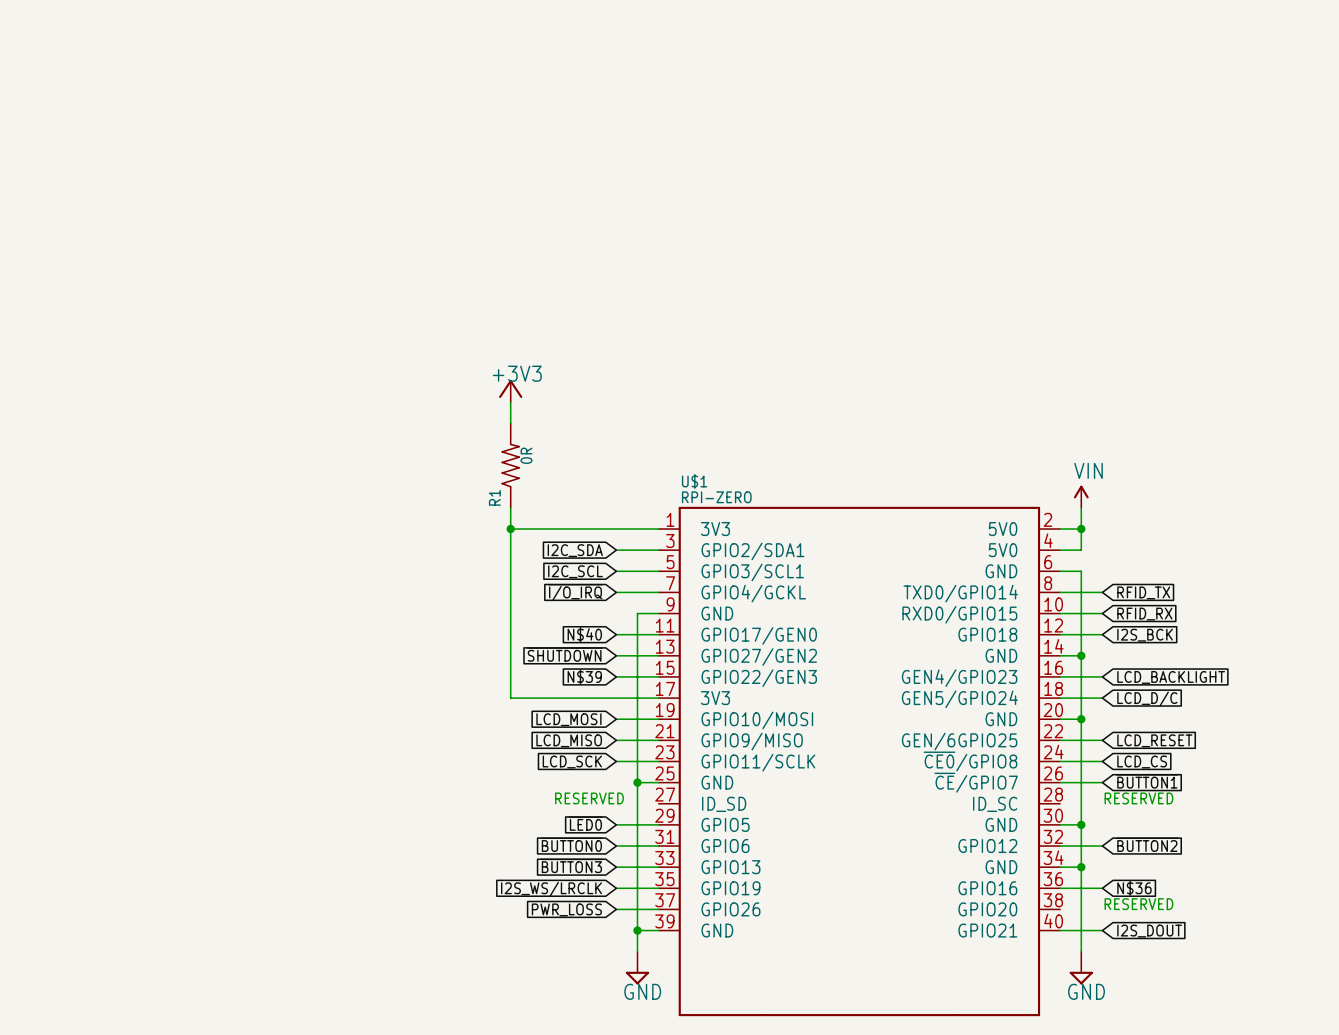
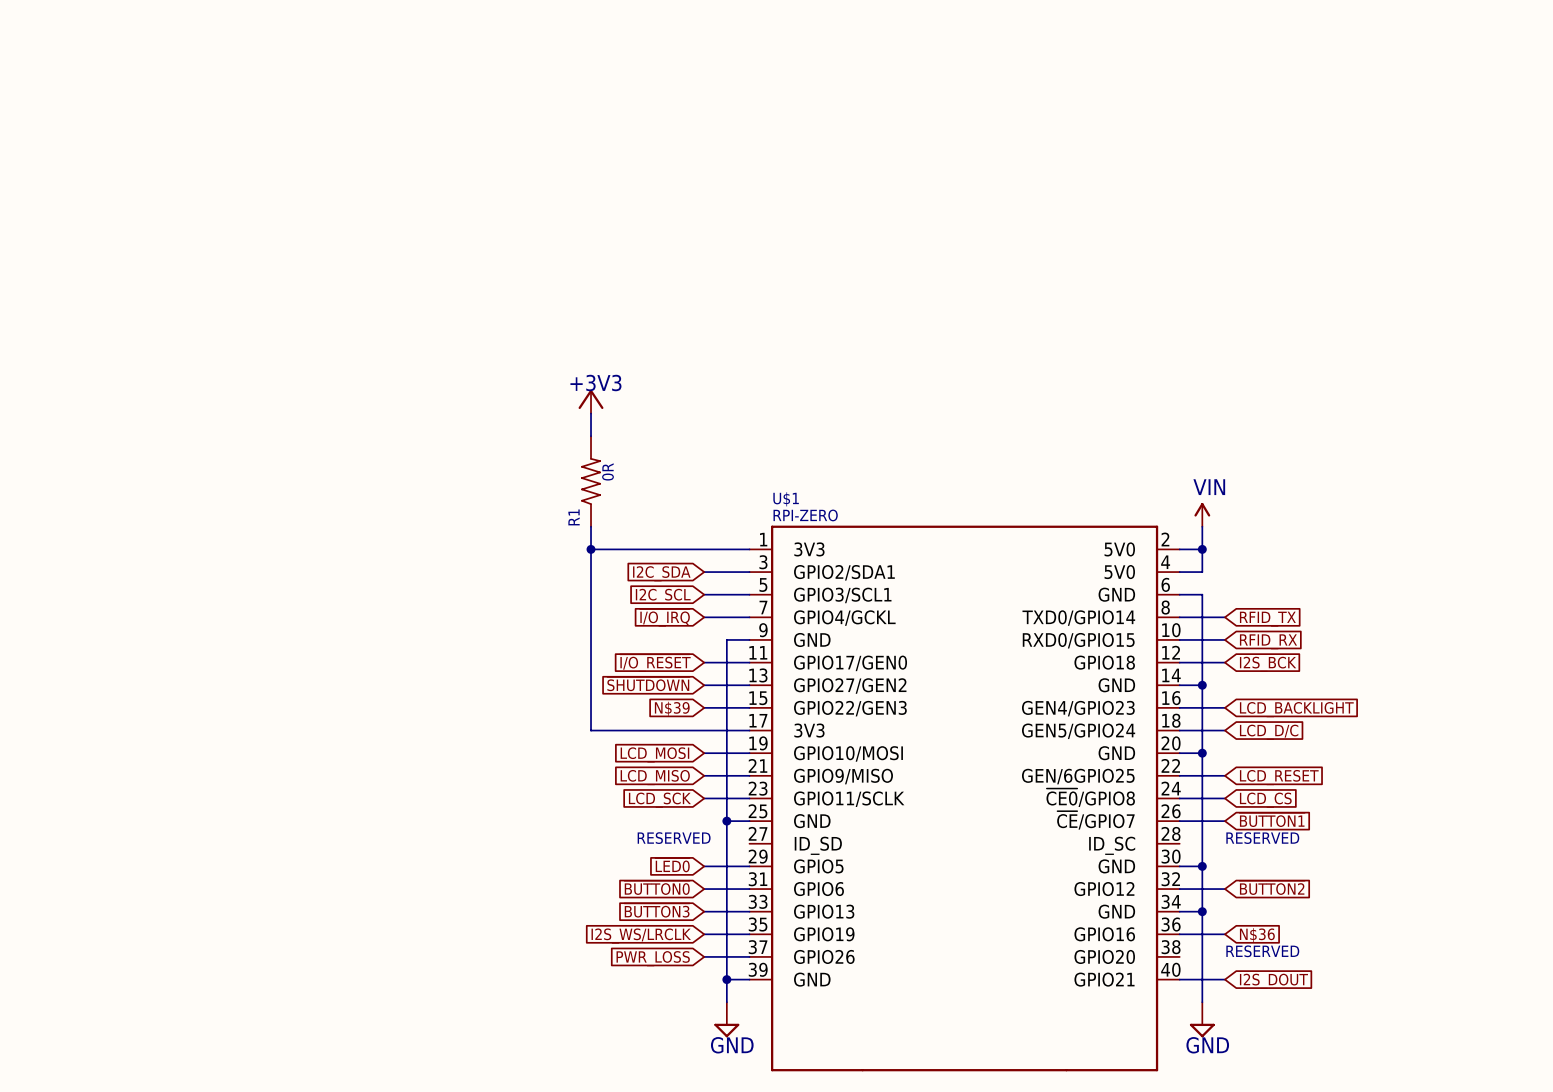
global label: N$40 (584, 634) -> ~{I/O_RESET} (655, 663)

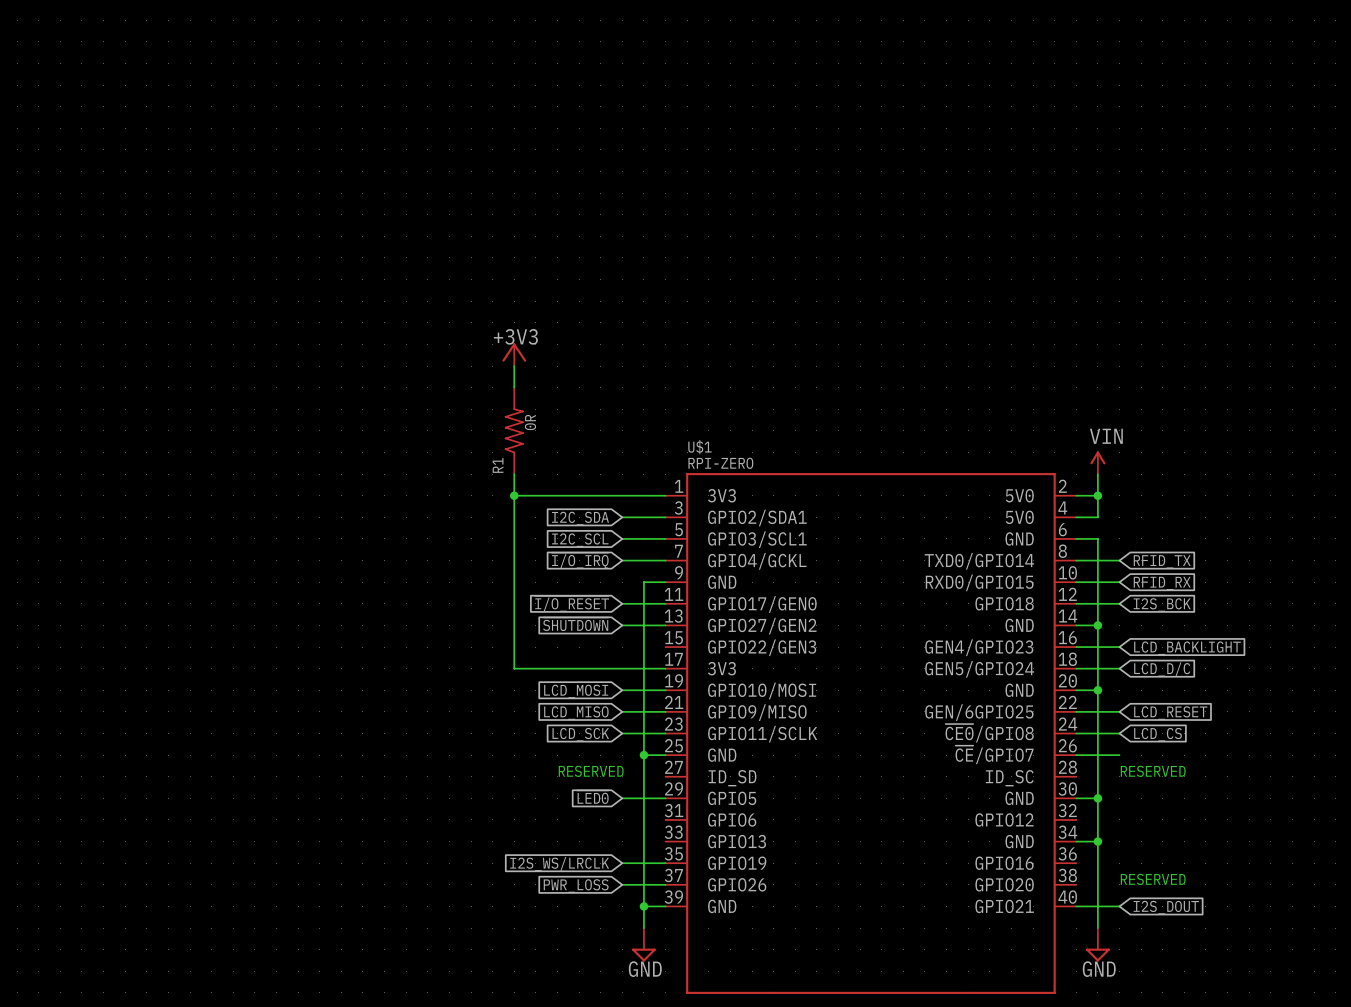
wire: (704, 707) (749, 707) -> none
global label: N$39 (672, 708) -> none
global label: ~{BUTTON1} (1272, 819) -> none
global label: ~{BUTTON0} (657, 887) -> none
global label: ~{BUTTON2} (1272, 887) -> none
wire: (704, 889) (749, 889) -> none
wire: (1179, 889) (1224, 889) -> none
global label: ~{BUTTON3} (657, 910) -> none
wire: (704, 911) (749, 911) -> none
wire: (1179, 934) (1224, 934) -> none
global label: N$36 (1257, 935) -> none

